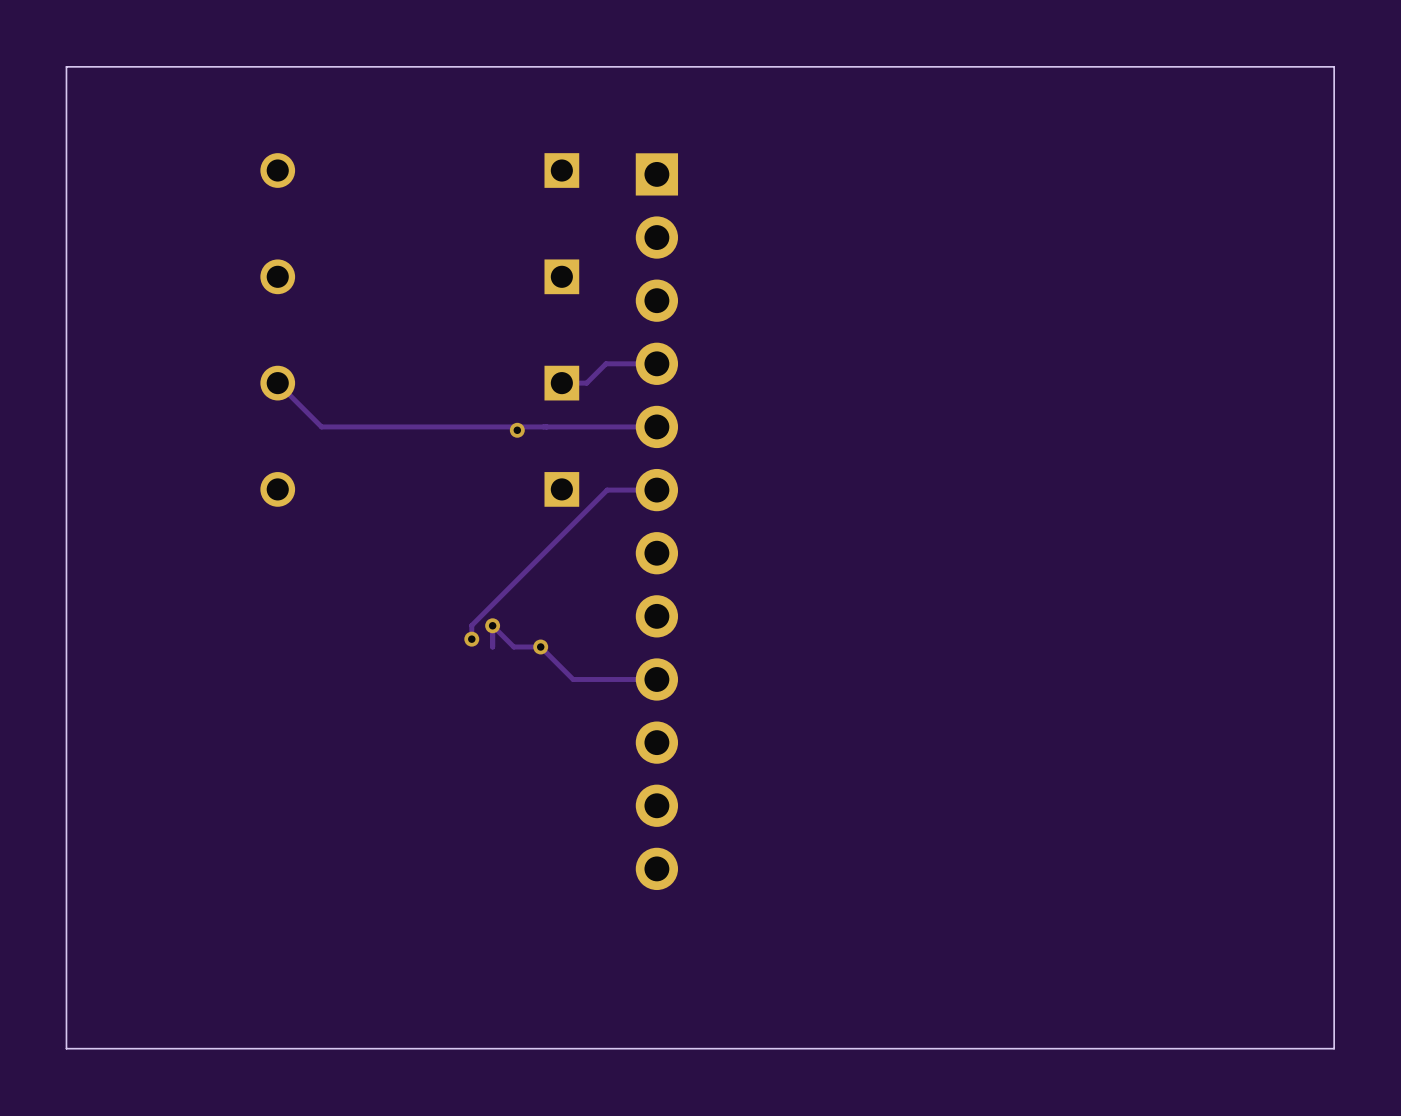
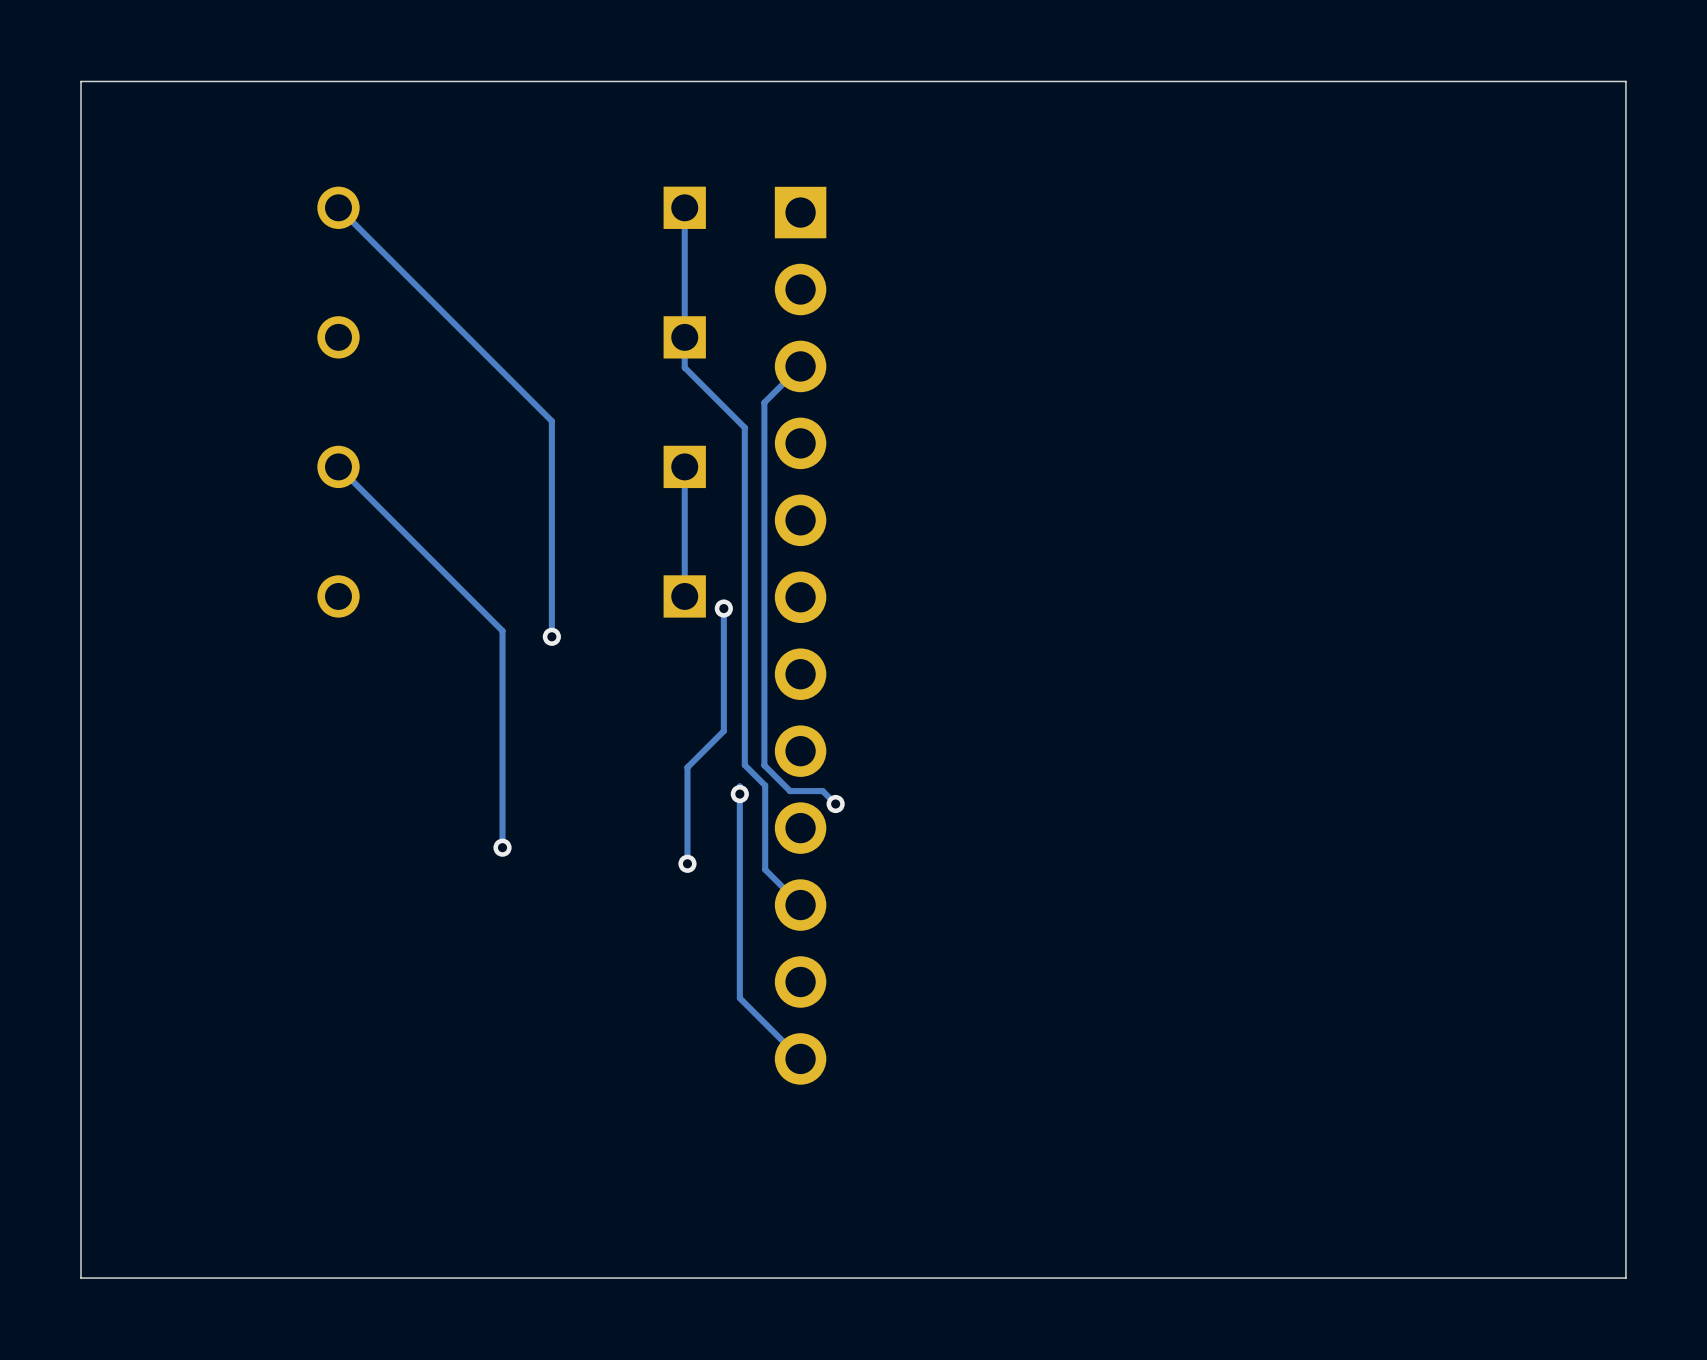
track: none -> (338, 207) (551, 421) (551, 636)
track: none -> (684, 207) (684, 367) (744, 427) (744, 765) (765, 785) (765, 869) (800, 905)
track: none -> (800, 366) (764, 402) (764, 765) (790, 791) (822, 791) (835, 804)
track: (656, 363) (606, 363) (586, 383) (561, 383) -> (684, 596) (684, 466)
track: (656, 426) (321, 426) -> (502, 847) (502, 630) (391, 520)
via: (517, 430) -> none
track: (656, 490) (607, 490) (471, 625) (471, 639) -> none
track: none -> (723, 608) (723, 731) (687, 767) (687, 863)
via: none -> (723, 608)
via: none -> (551, 636)
via: (492, 625) -> none
via: (471, 639) -> none
track: none -> (739, 786) (739, 998) (800, 1058)
track: (492, 647) (492, 625) (513, 647) (540, 647) (573, 679) (656, 679) -> none
via: (540, 647) -> none
via: none -> (739, 794)
via: none -> (835, 804)
via: none -> (502, 847)
via: none -> (687, 863)

